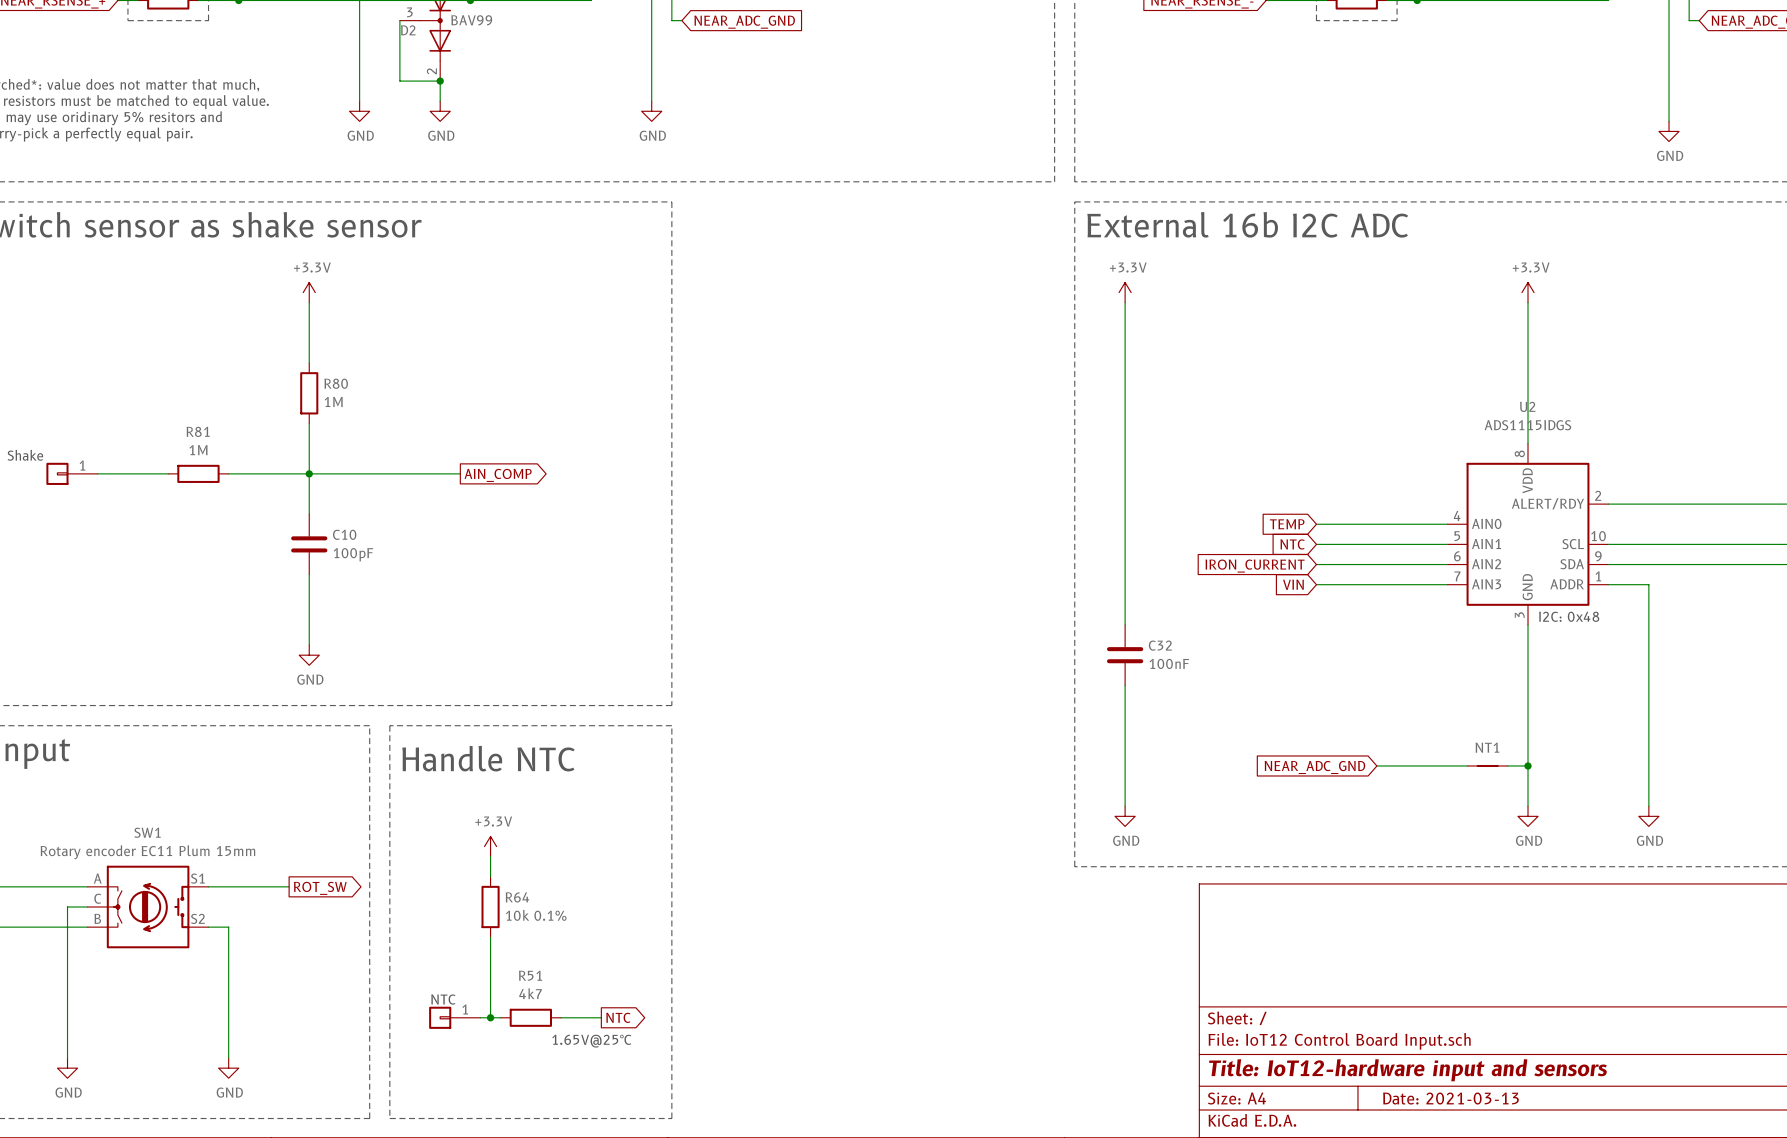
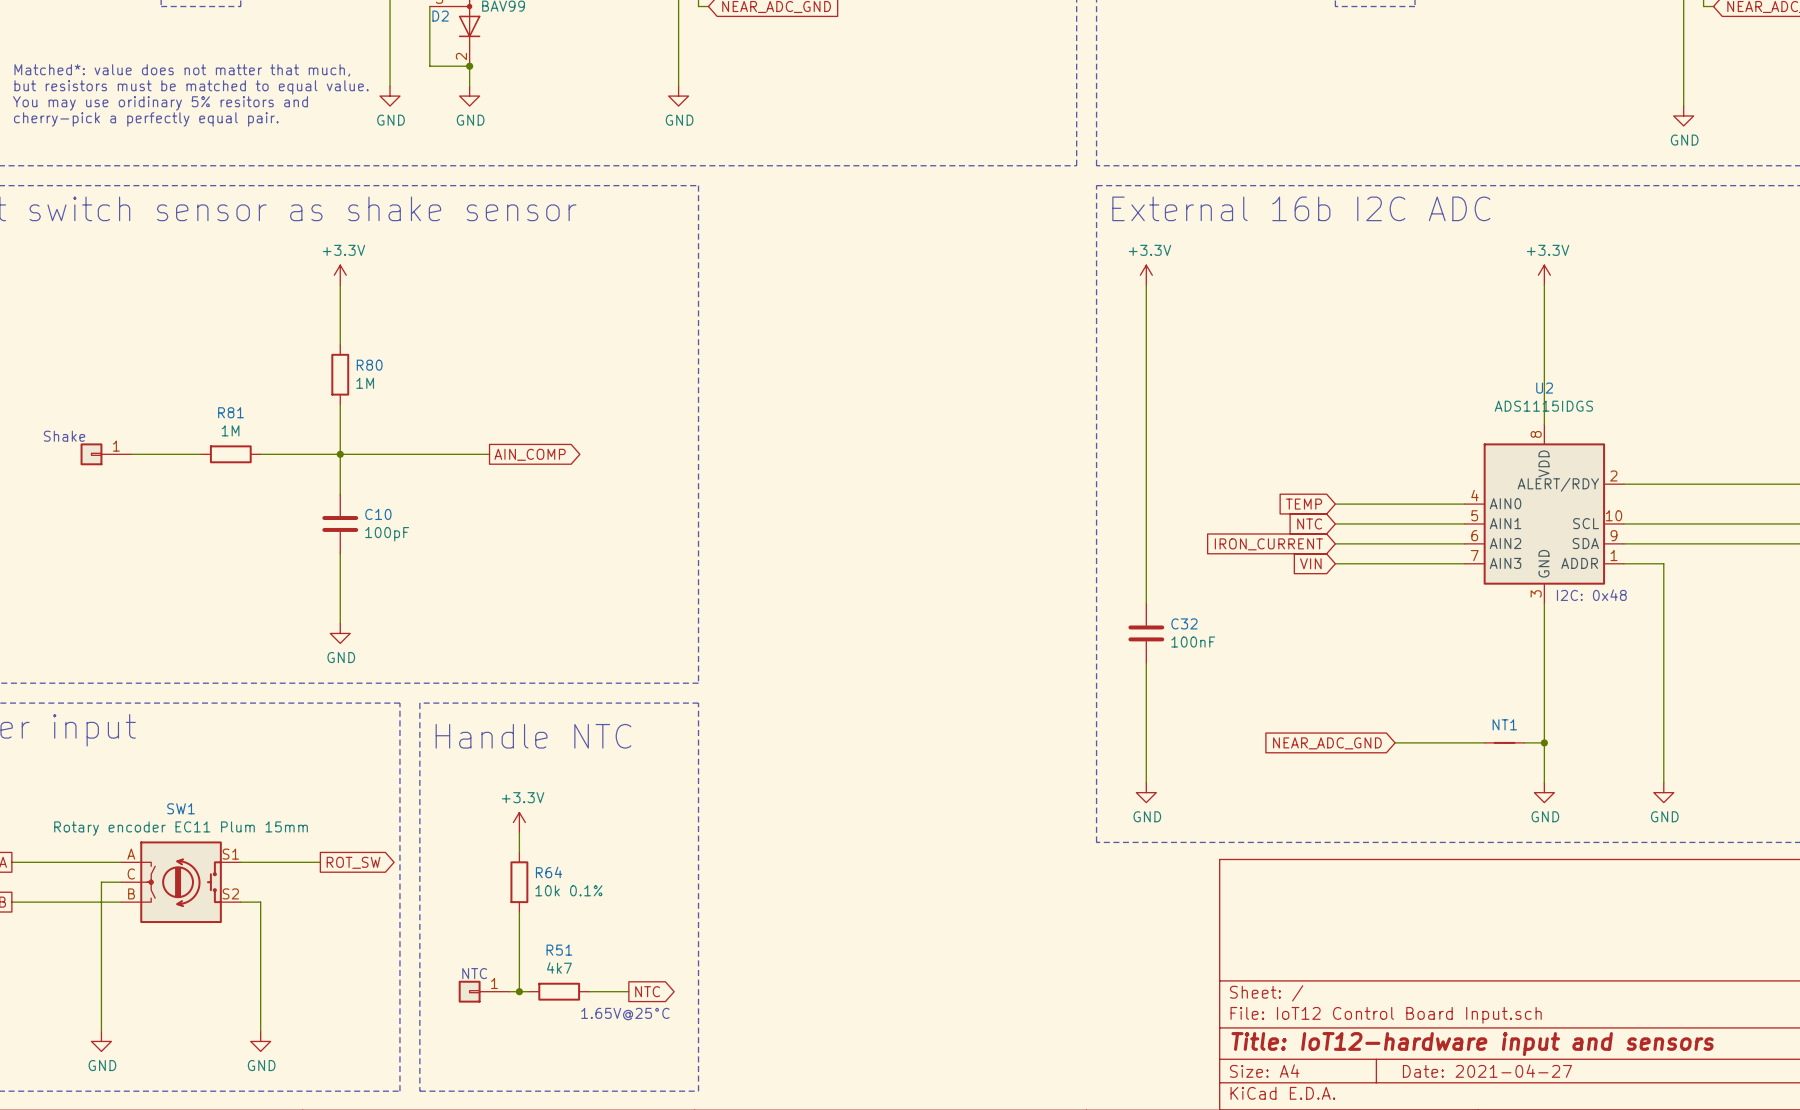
title block: Date: 2021-03-13 (1450, 1098) -> Date: 2021-04-27 (1487, 1071)

